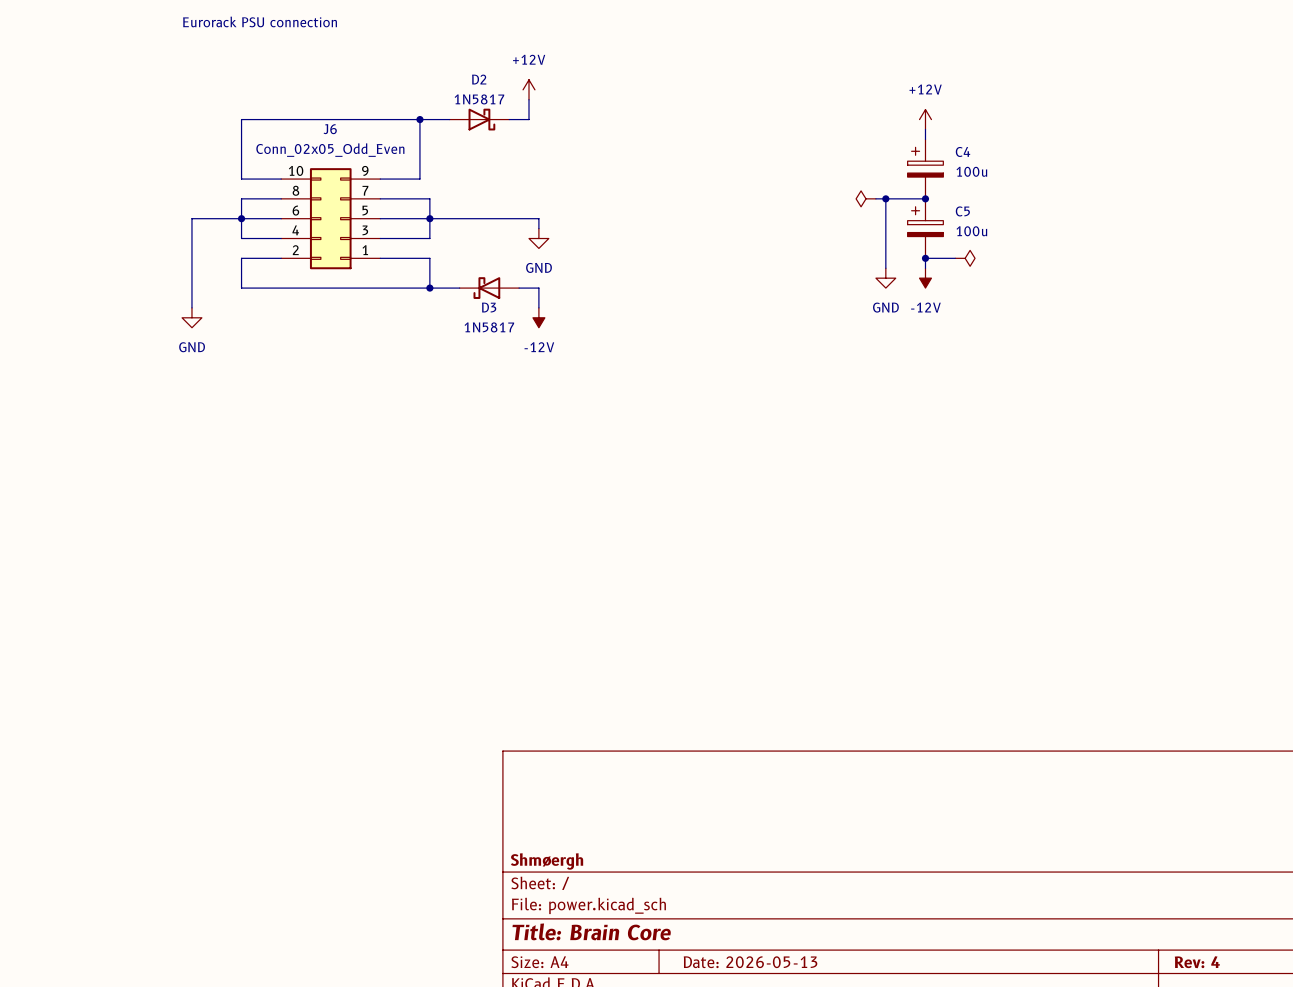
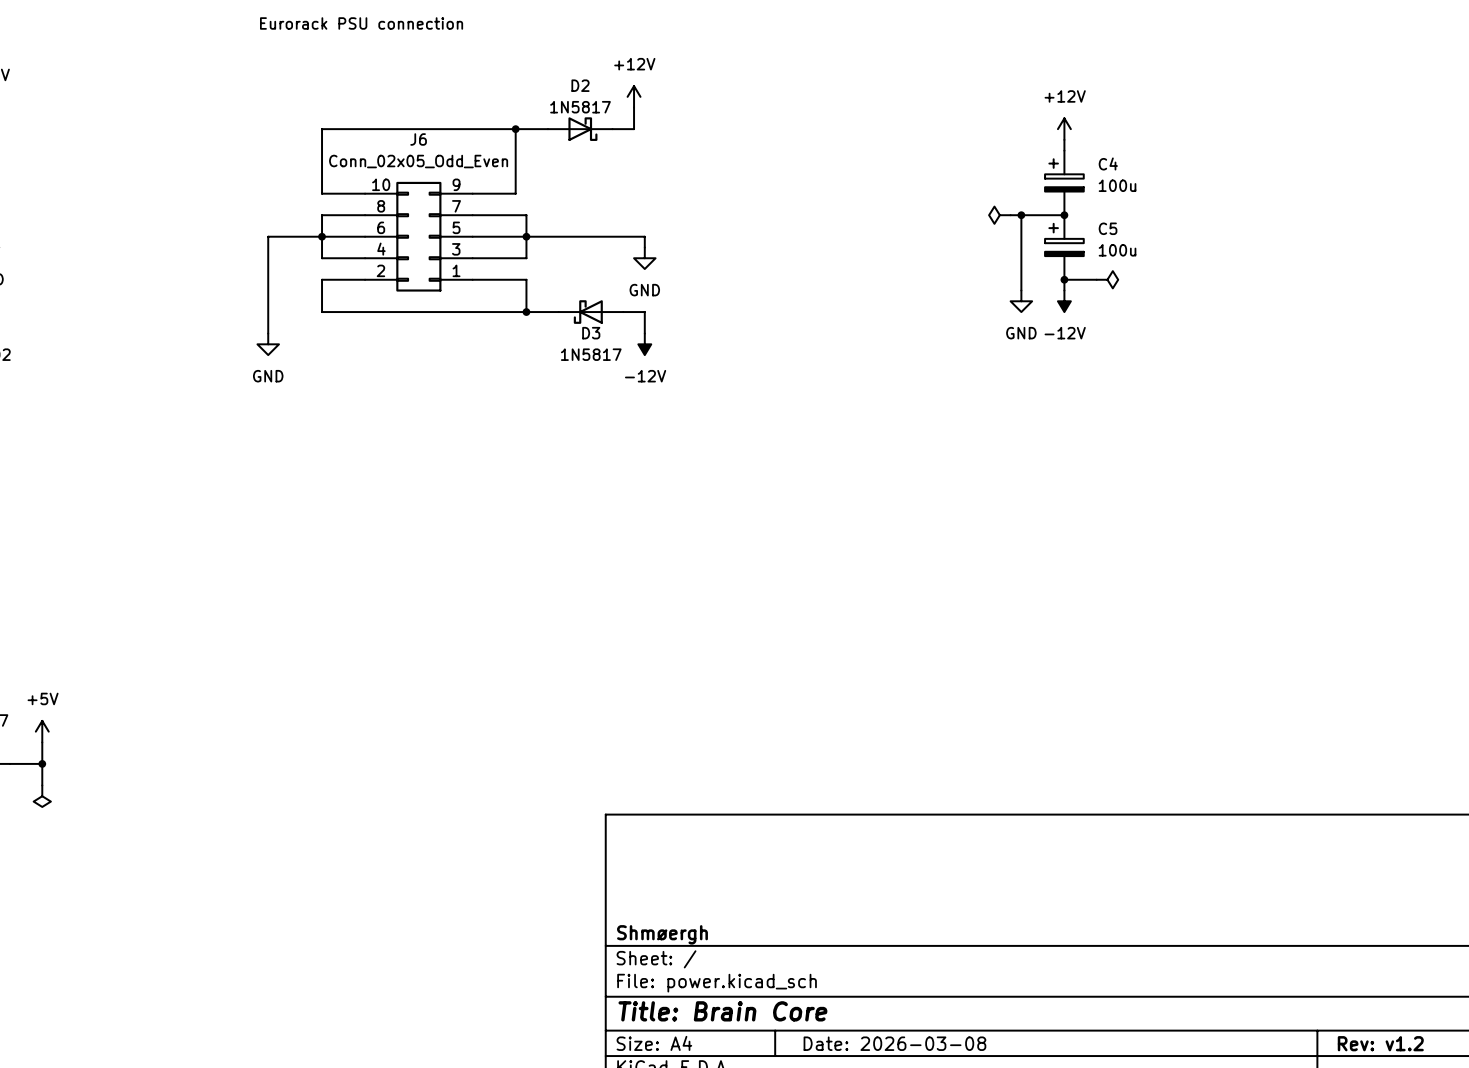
title block: Date: 2026-05-13 (750, 962) -> Date: 2026-03-08 (894, 1043)
title block: Rev: 4 (1197, 962) -> Rev: v1.2 (1380, 1043)

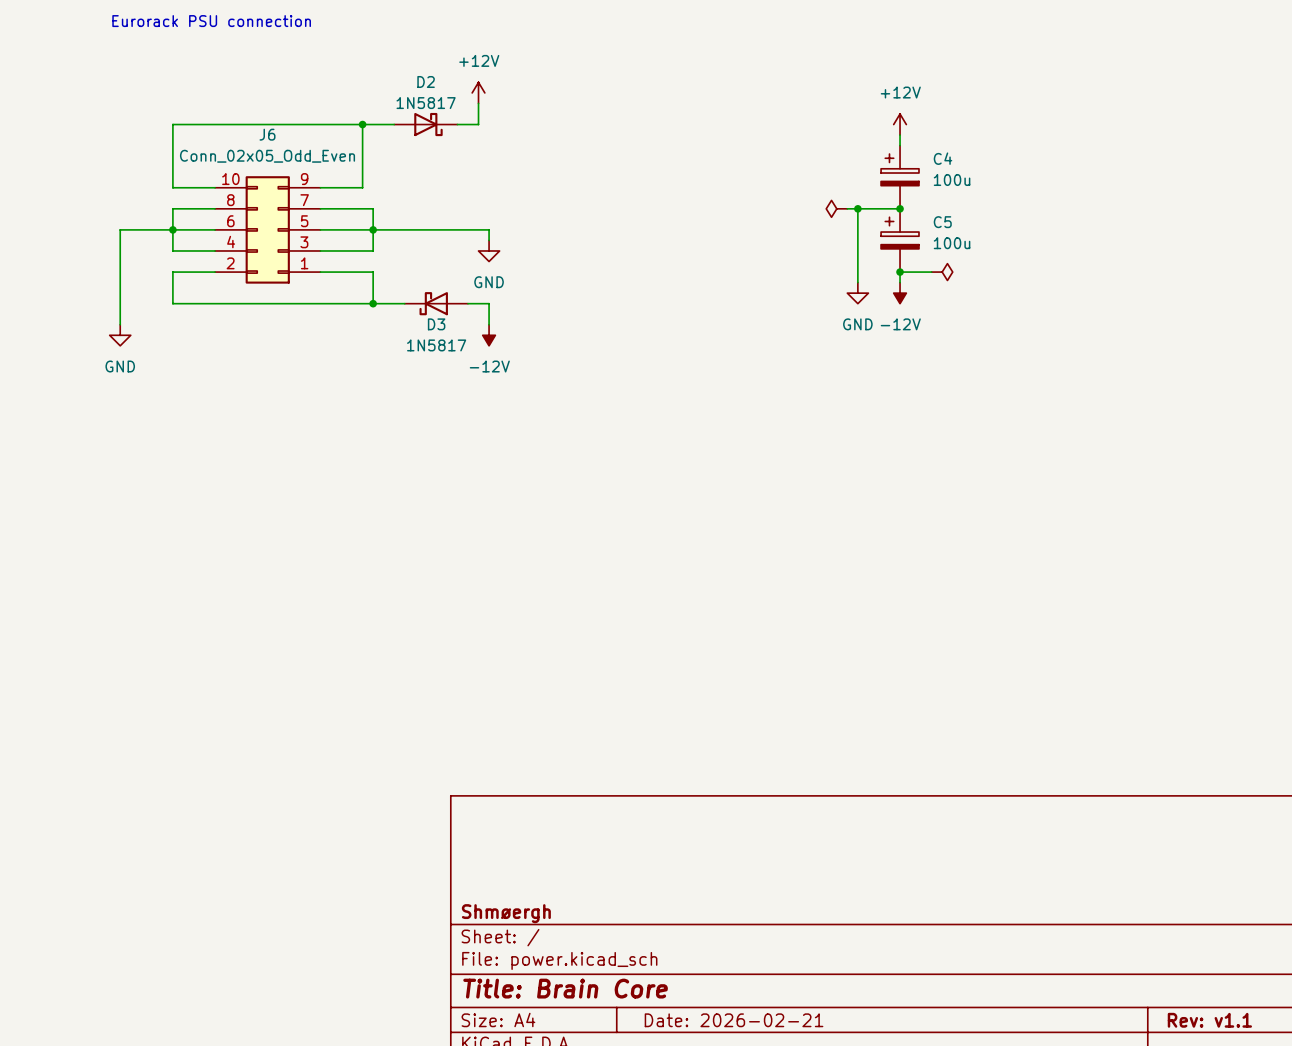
title block: Date: 2026-03-08 (894, 1043) -> Date: 2026-02-21 (734, 1020)
title block: Rev: v1.2 (1380, 1043) -> Rev: v1.1 (1209, 1020)

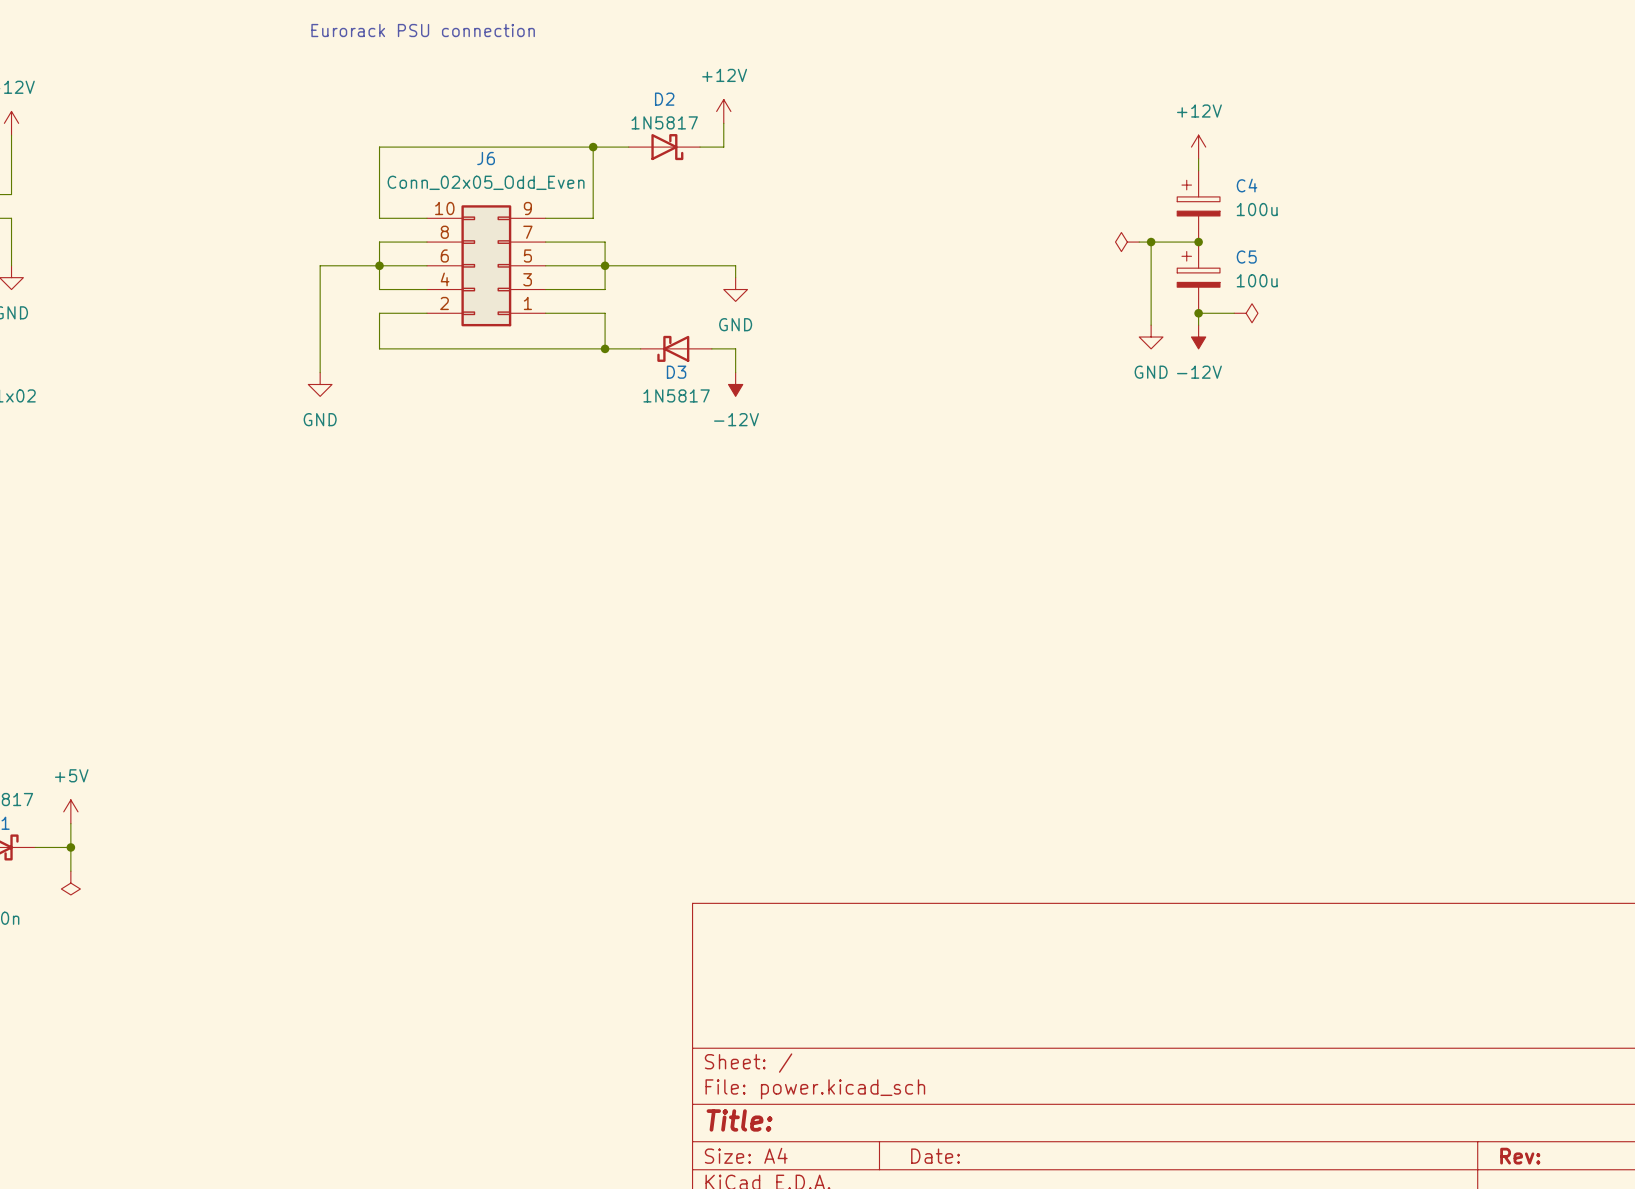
title block: Shmøergh (506, 913) -> none
title block: Title: Brain Core (565, 988) -> Title: (739, 1120)
title block: Date: 2026-02-21 (734, 1020) -> Date: (935, 1156)
title block: Rev: v1.1 (1209, 1020) -> Rev: (1520, 1156)

